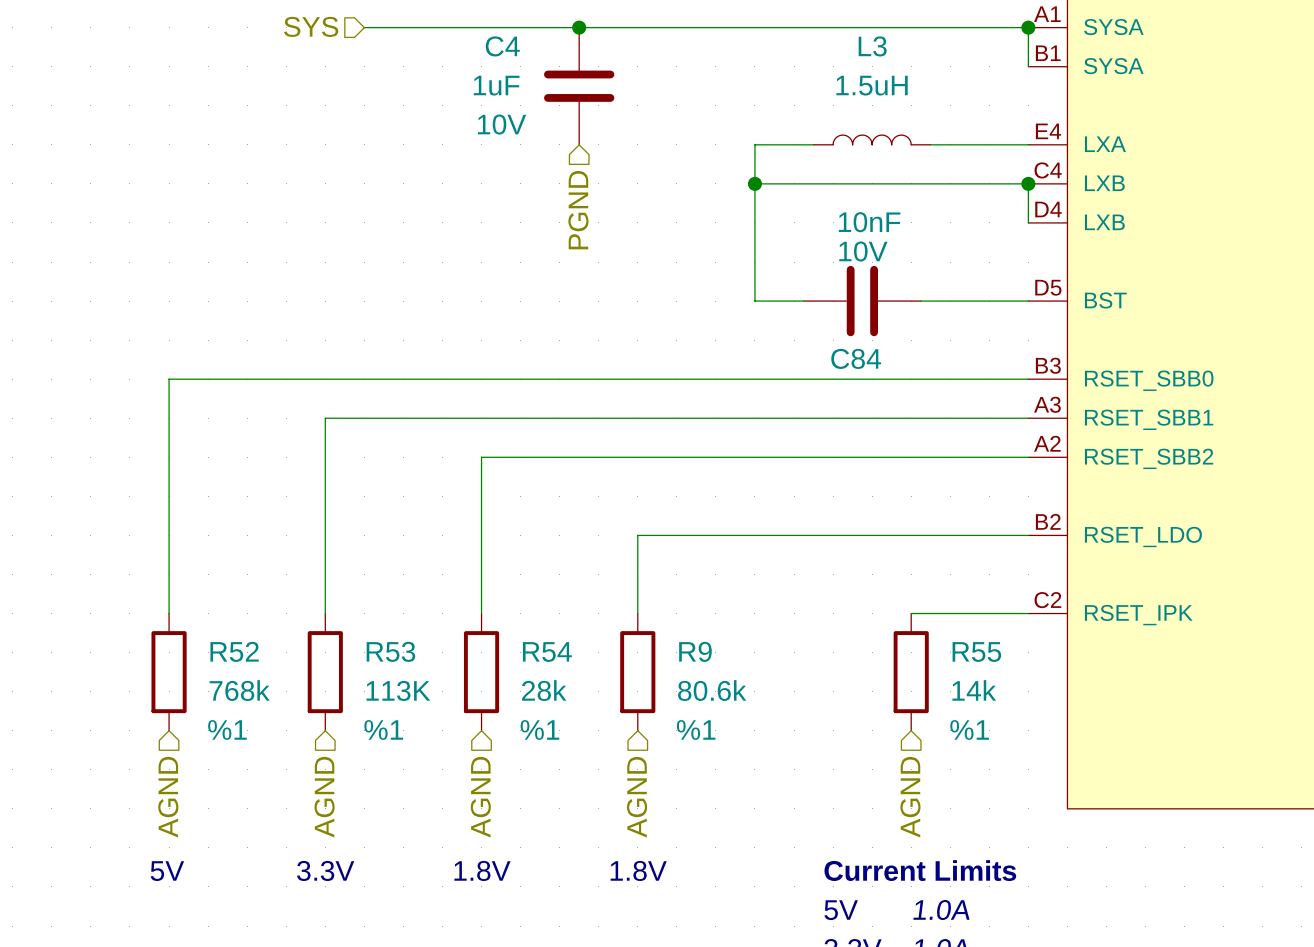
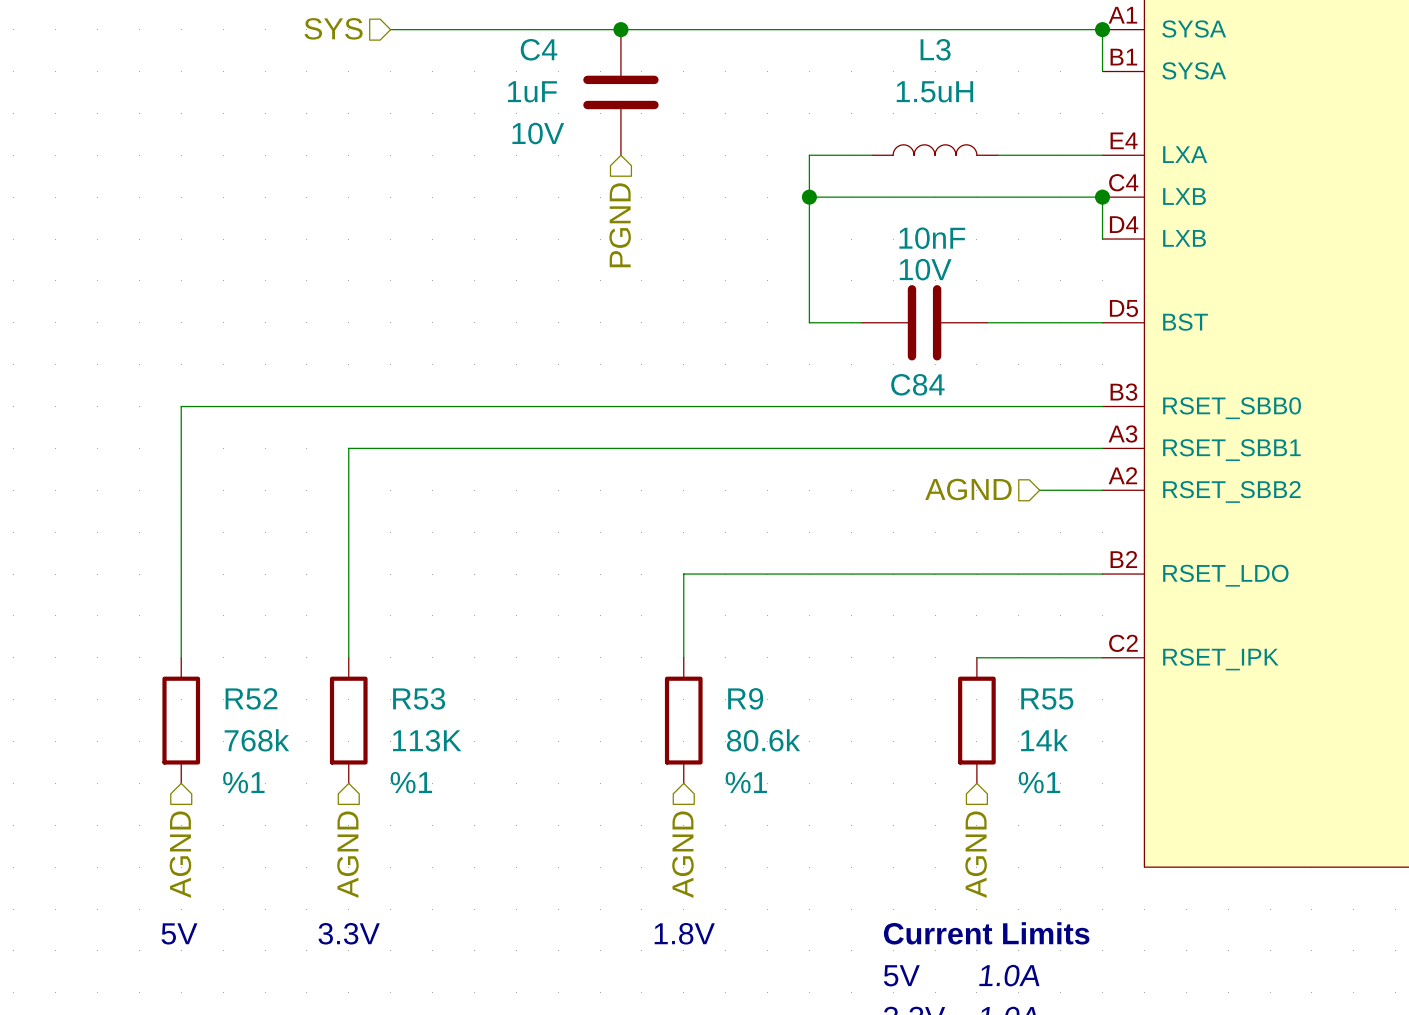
hierarchical label: none -> AGND (968, 489)
wire: (969, 457) (481, 457) (481, 613) -> none
R54: 28k (481, 672) -> none
hierarchical label: AGND (480, 797) -> none
text: 1.8V (482, 870) -> none

